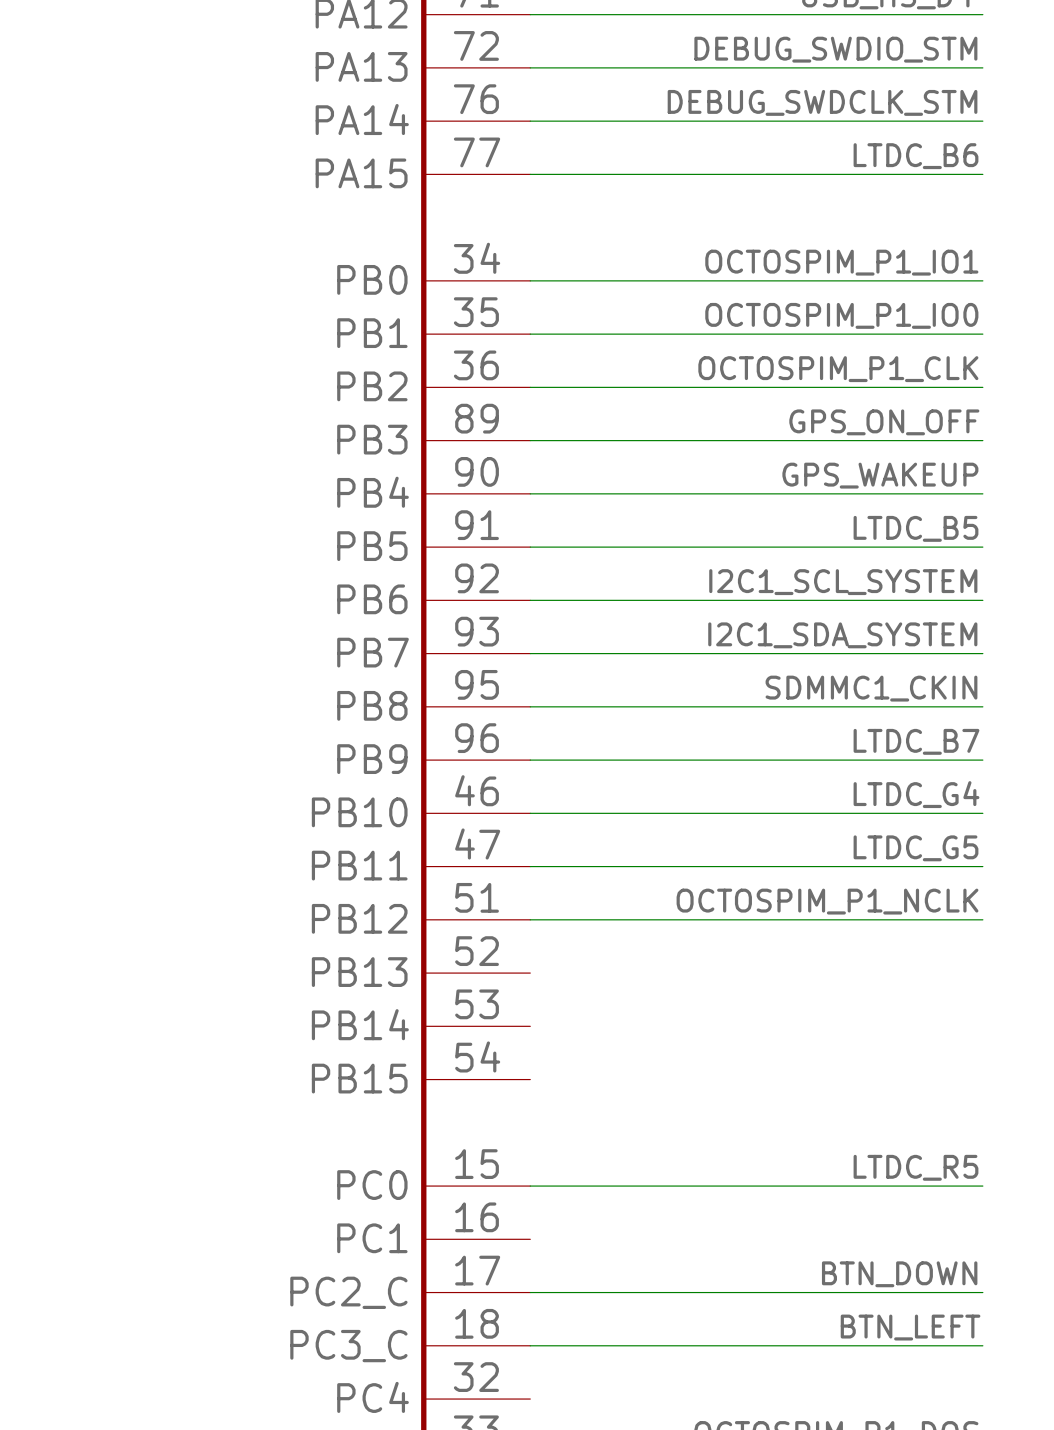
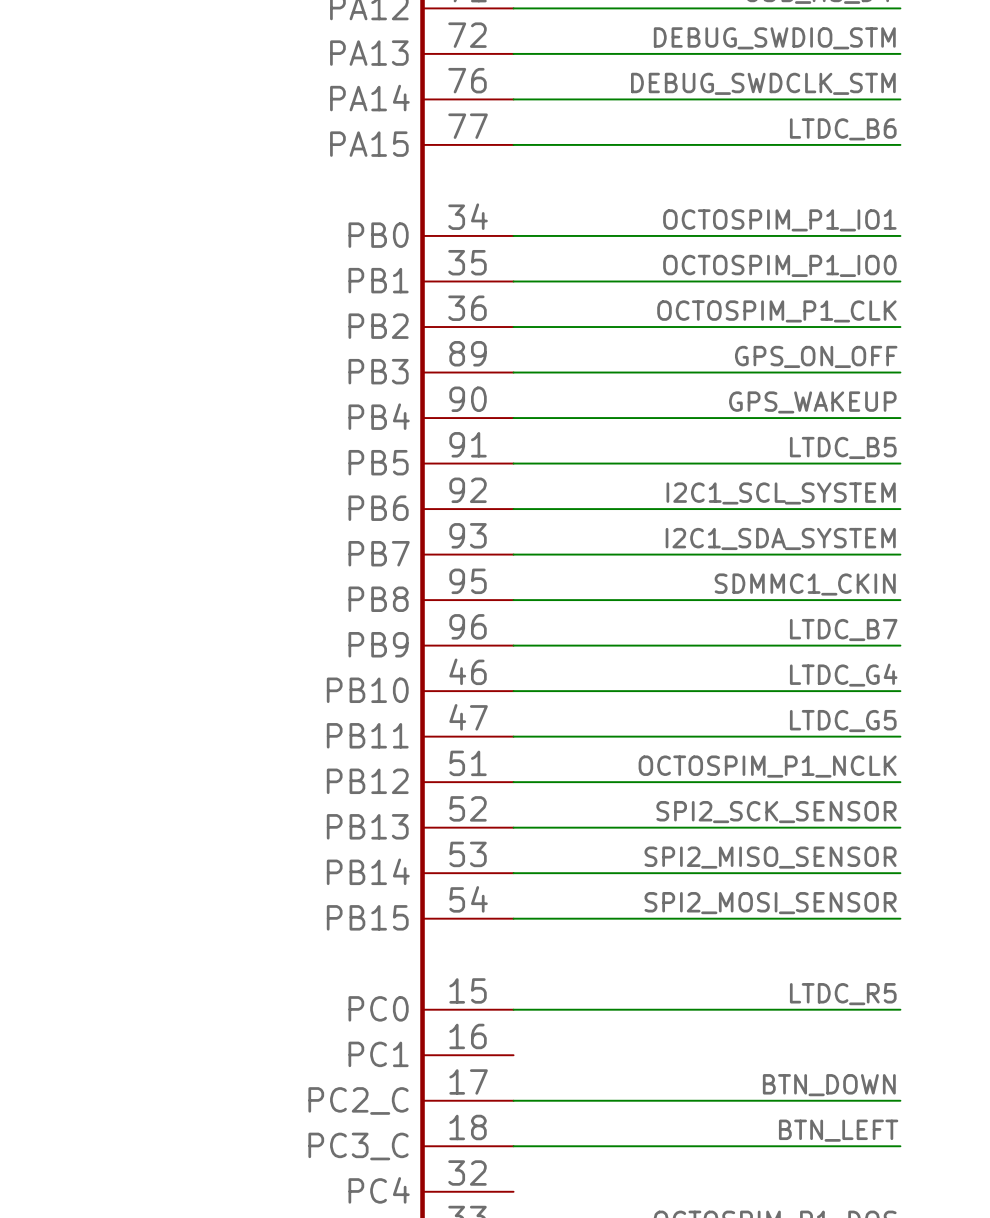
label: none -> SPI2_SCK_SENSOR (776, 812)
wire: none -> (513, 827) (900, 827)
label: none -> SPI2_MISO_SENSOR (770, 857)
wire: none -> (513, 873) (900, 873)
label: none -> SPI2_MOSI_SENSOR (770, 903)
wire: none -> (513, 918) (900, 918)

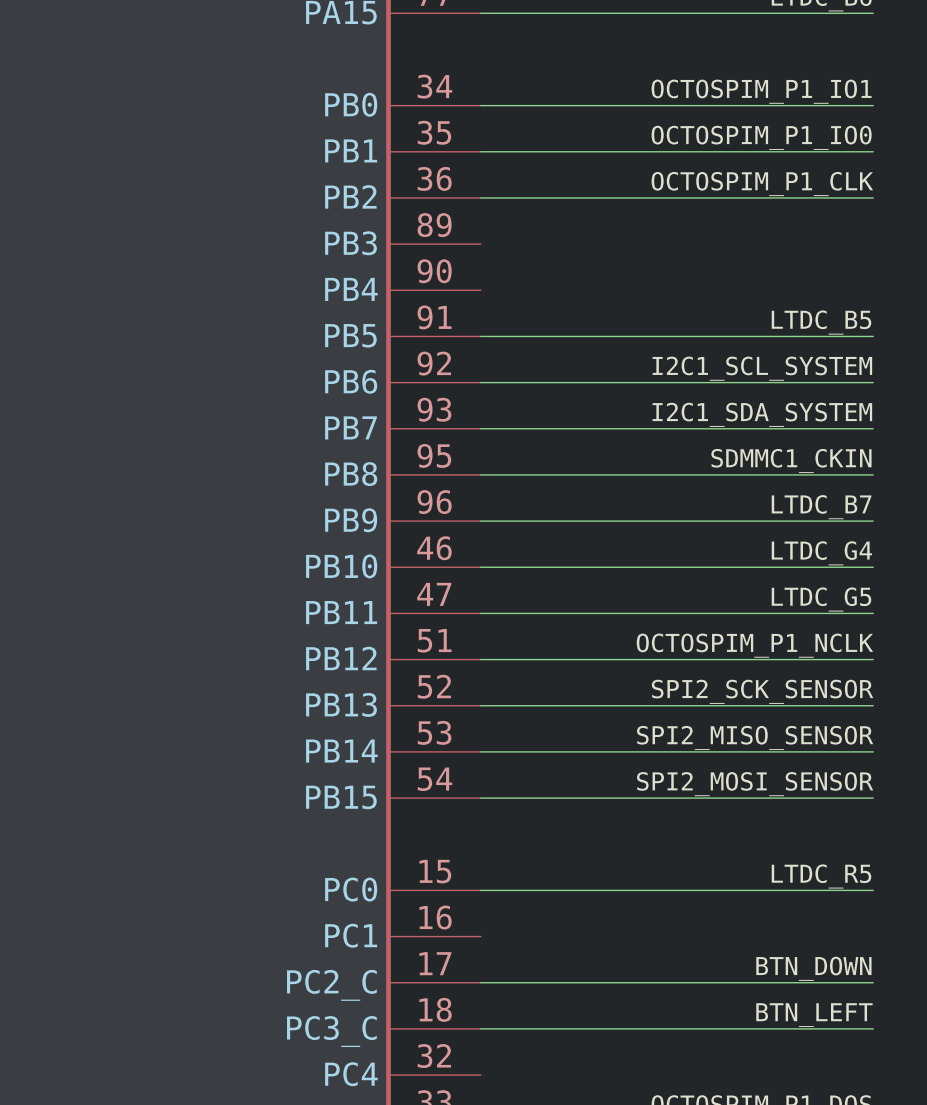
label: GPS_ON_OFF (816, 356) -> none
wire: (513, 372) (900, 372) -> none
label: GPS_WAKEUP (812, 402) -> none
wire: (513, 418) (900, 418) -> none

